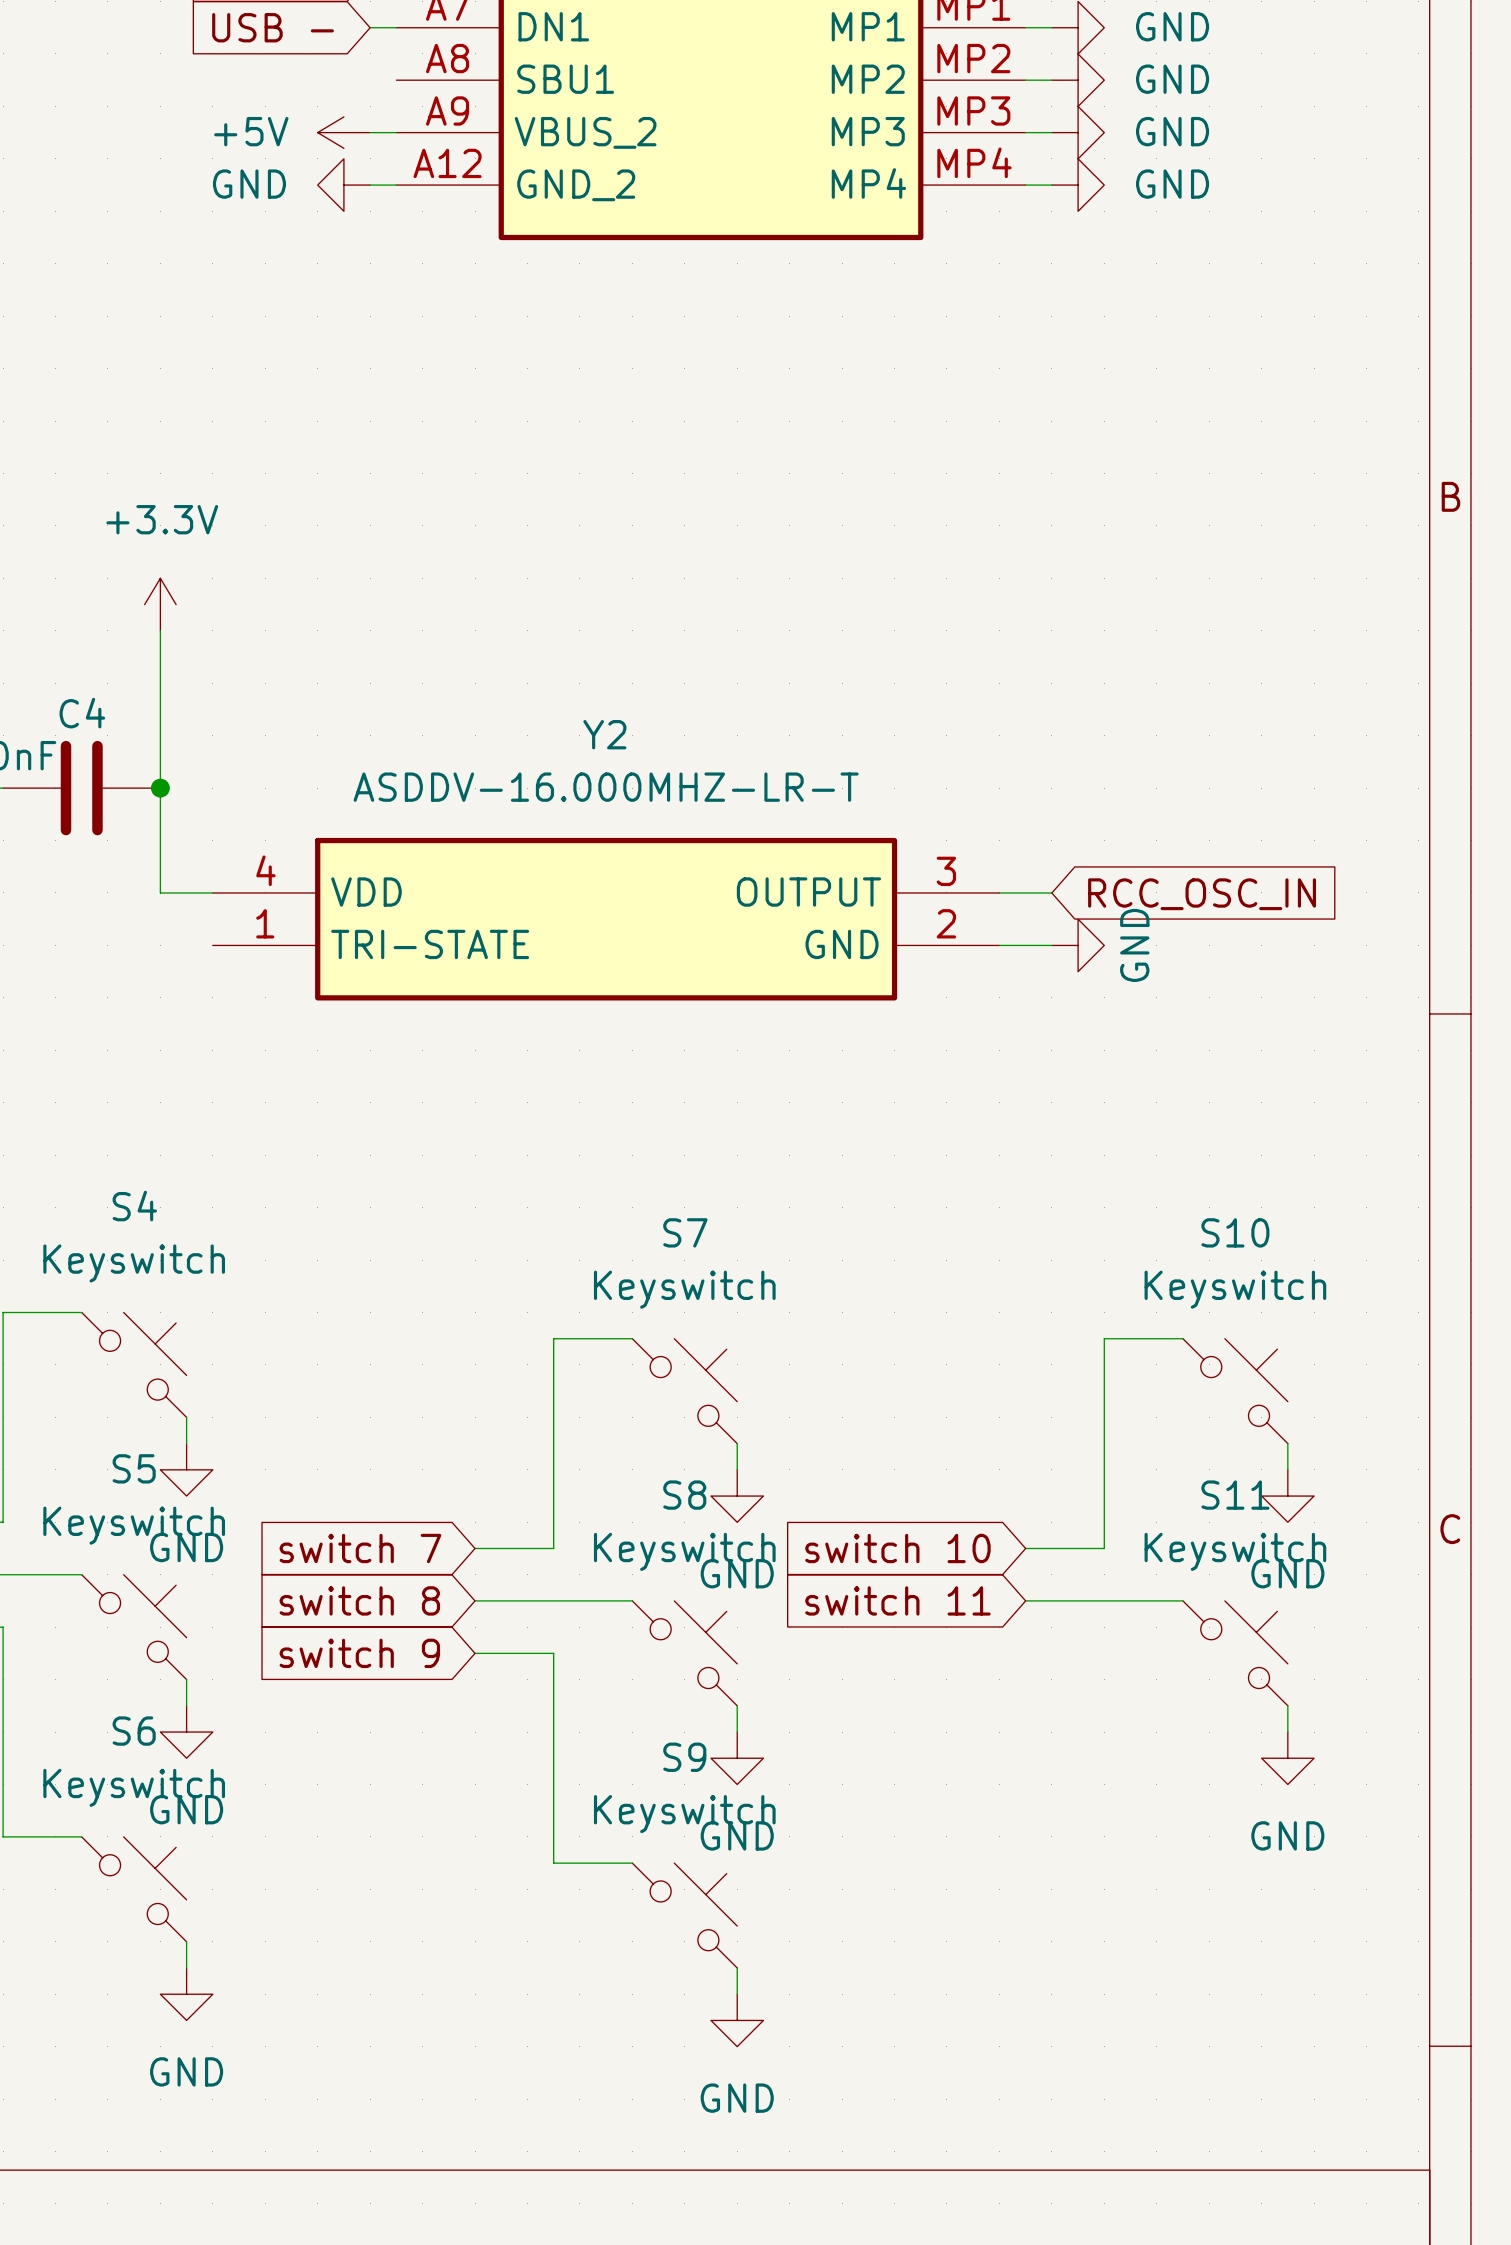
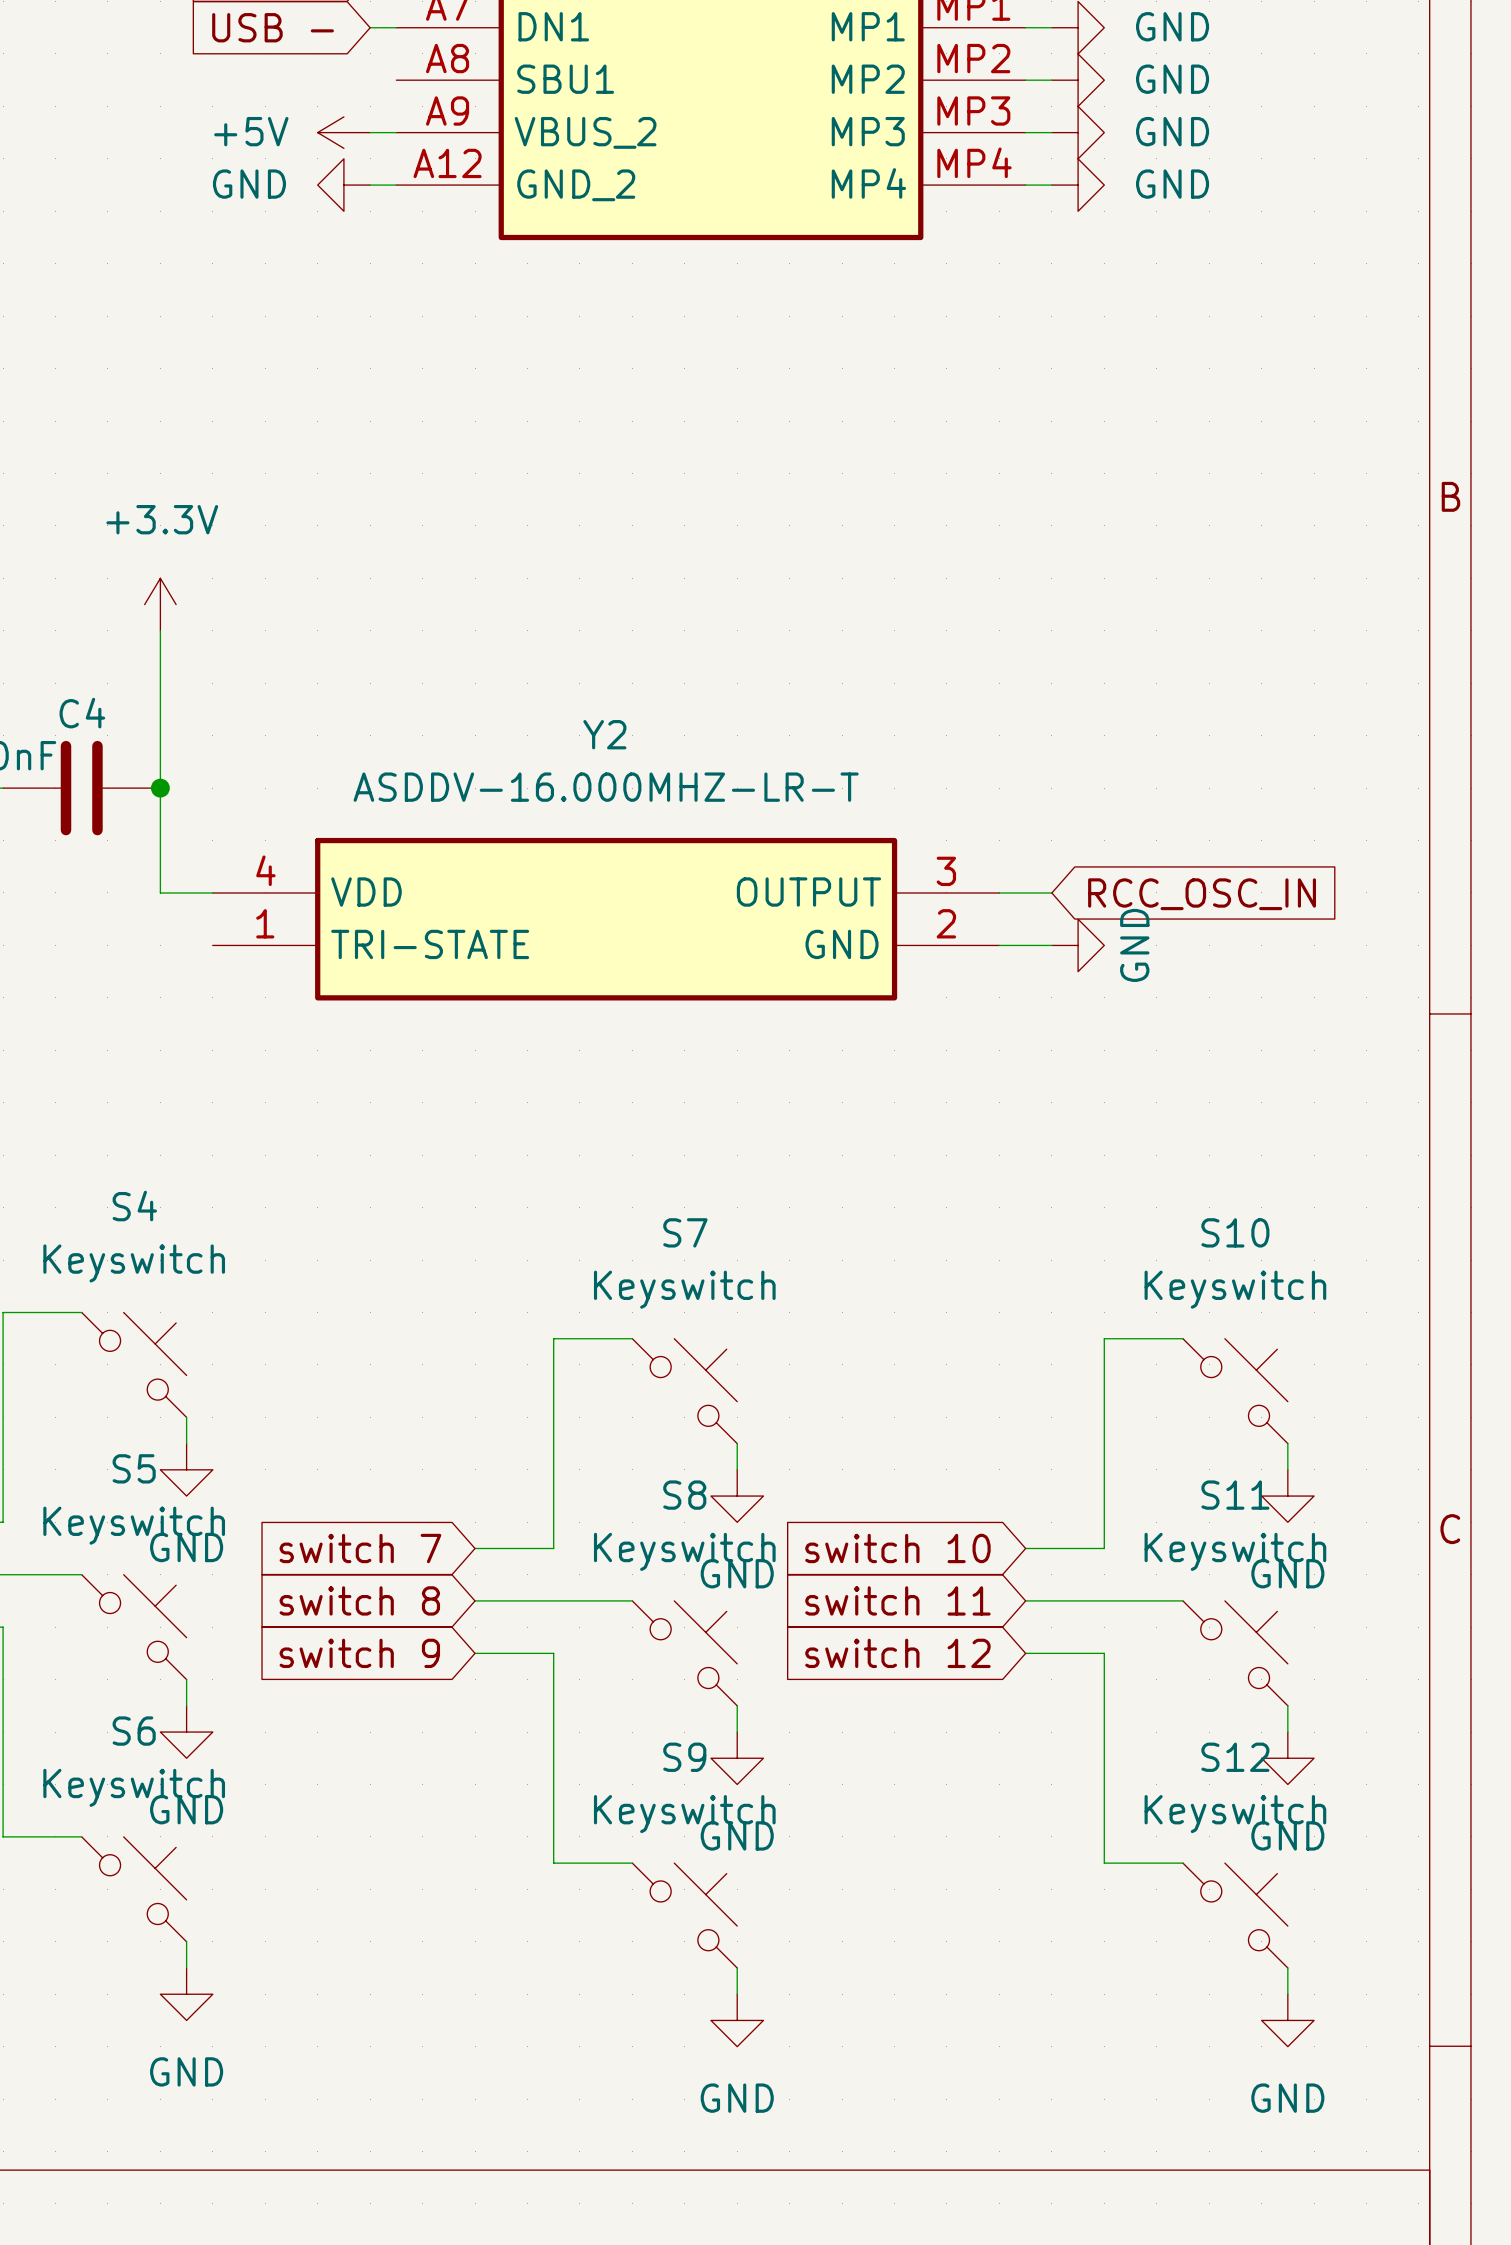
global label: none -> switch 12 (897, 1653)
wire: none -> (1025, 1653) (1104, 1653) (1104, 1863) (1182, 1863)
S12: none -> Keyswitch (1235, 1915)
wire: none -> (1287, 1968) (1287, 1994)
power symbol: none -> GND (1287, 2020)

